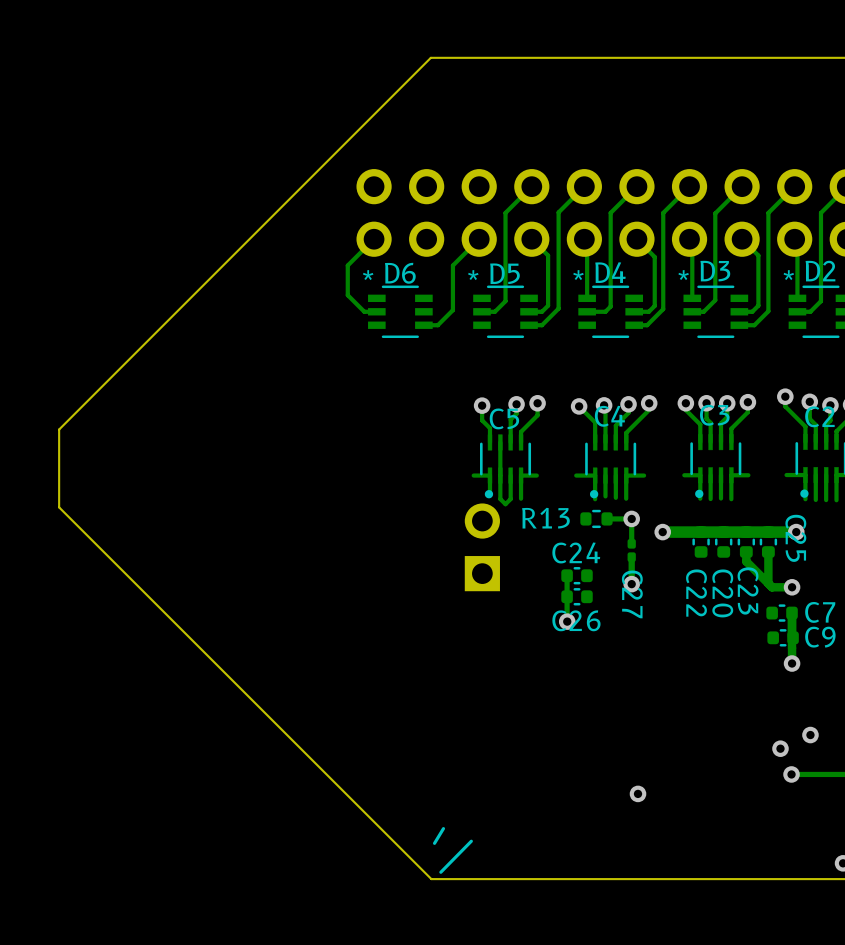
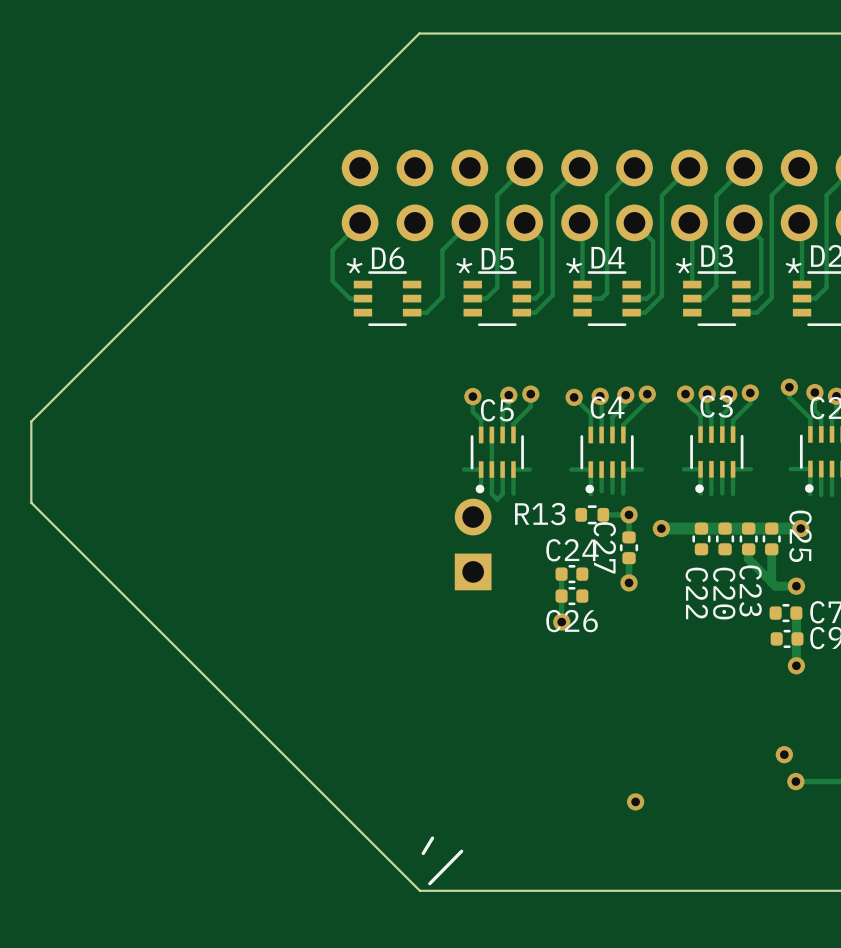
C27 footprint: [627, 539, 636, 562] -> [619, 531, 639, 565]
C27 name position: C27 (632, 594) -> C27 (604, 547)
via: (810, 735) -> none

